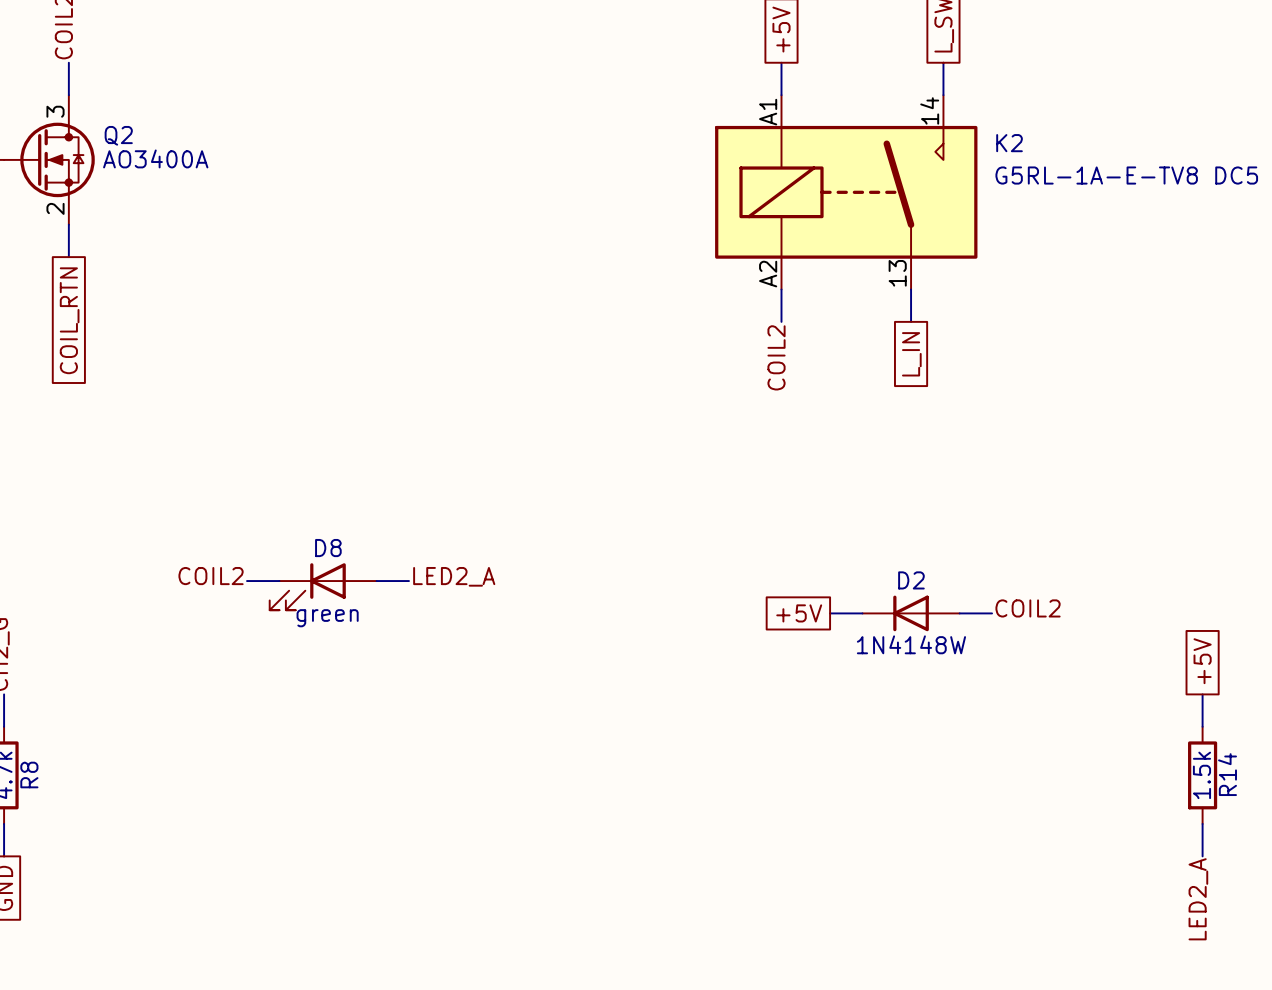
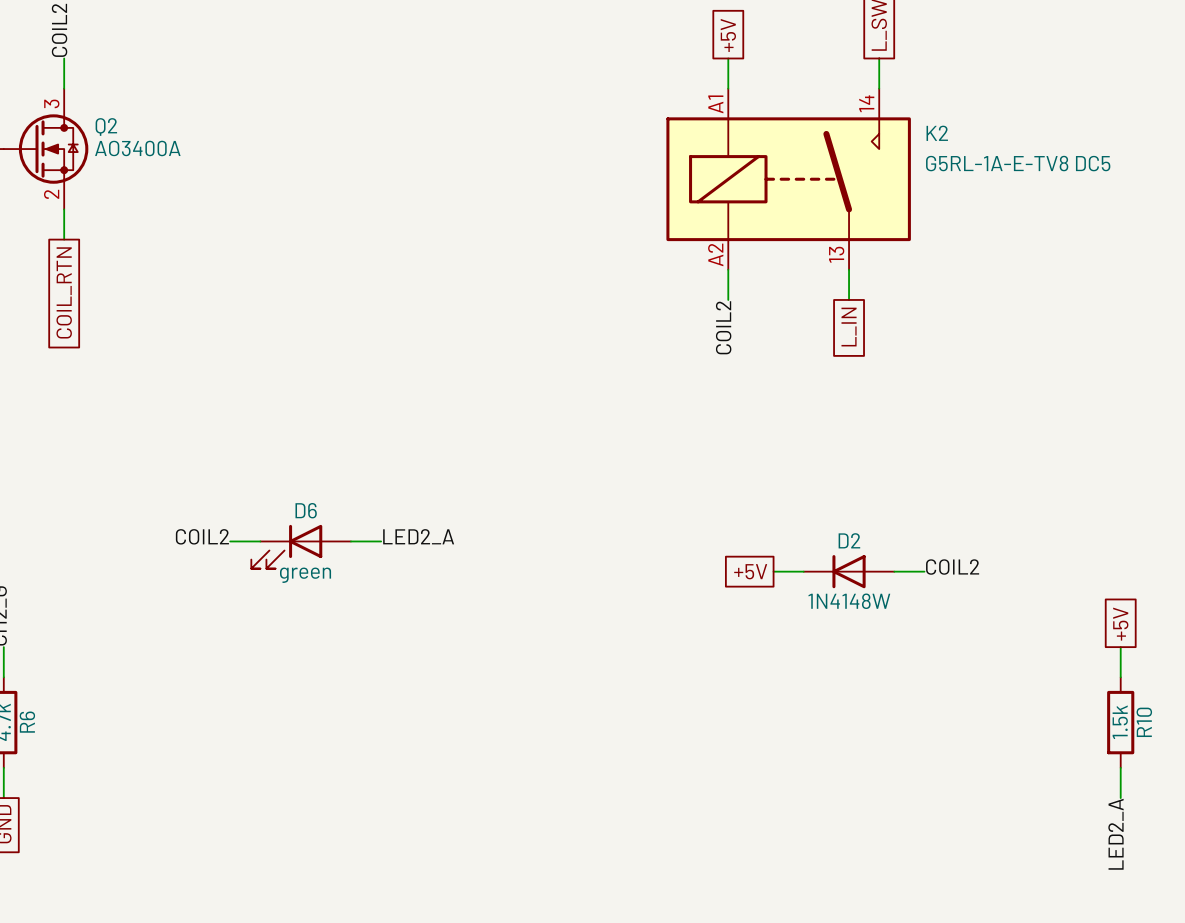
D8 name: D8 (328, 548) -> D6 (306, 510)
R8 name: R8 (29, 774) -> R6 (27, 722)
R14 name: R14 (1227, 774) -> R10 (1144, 722)

